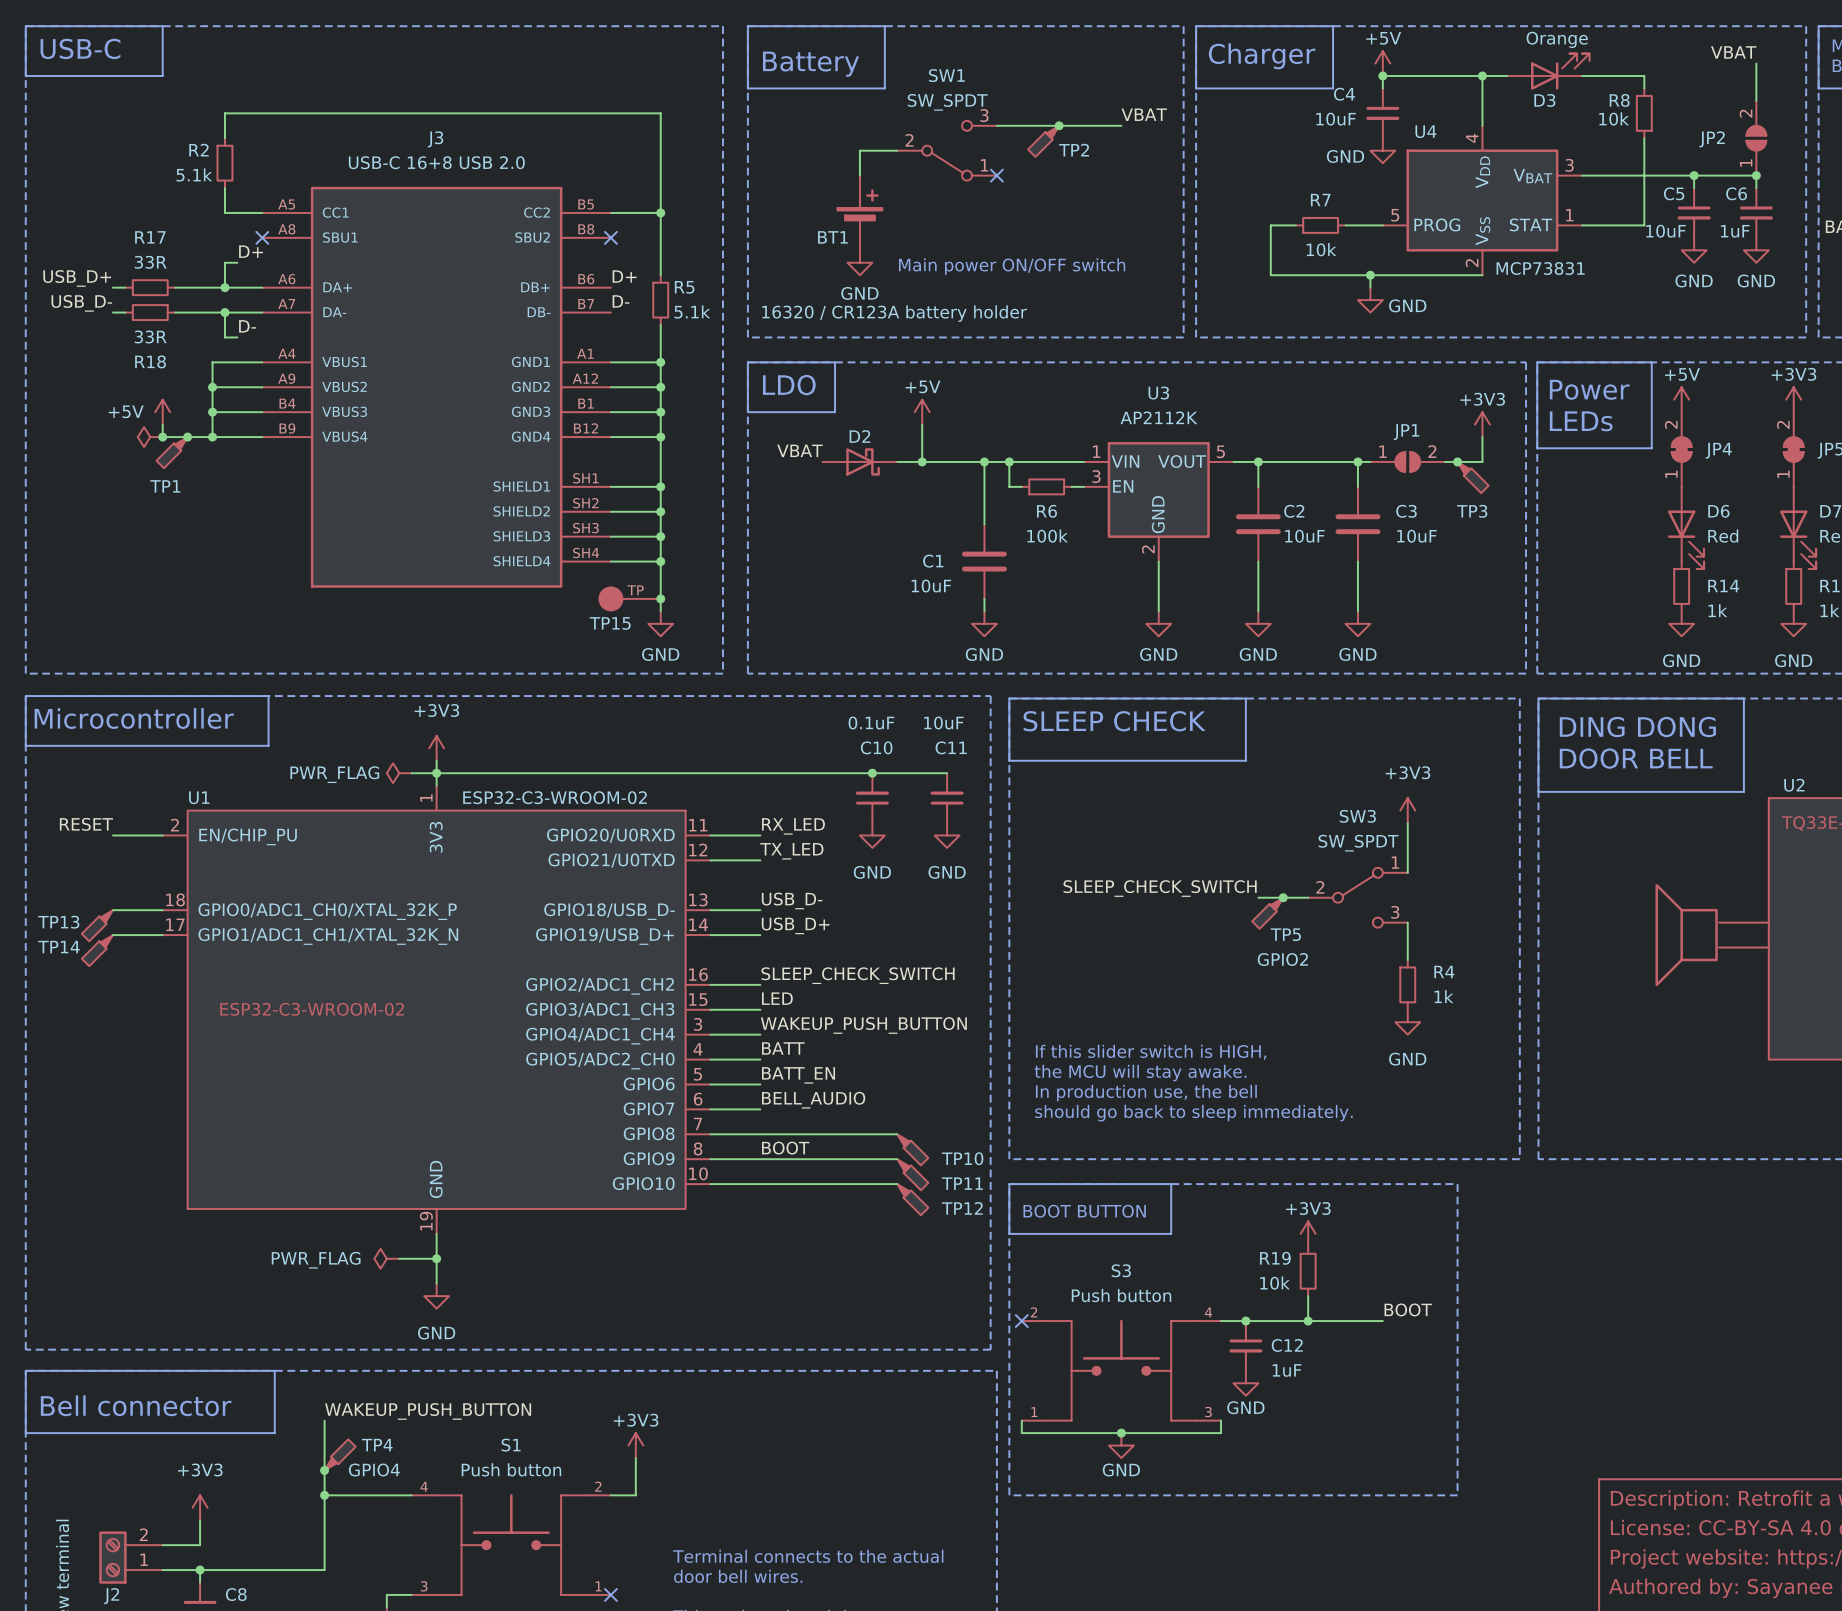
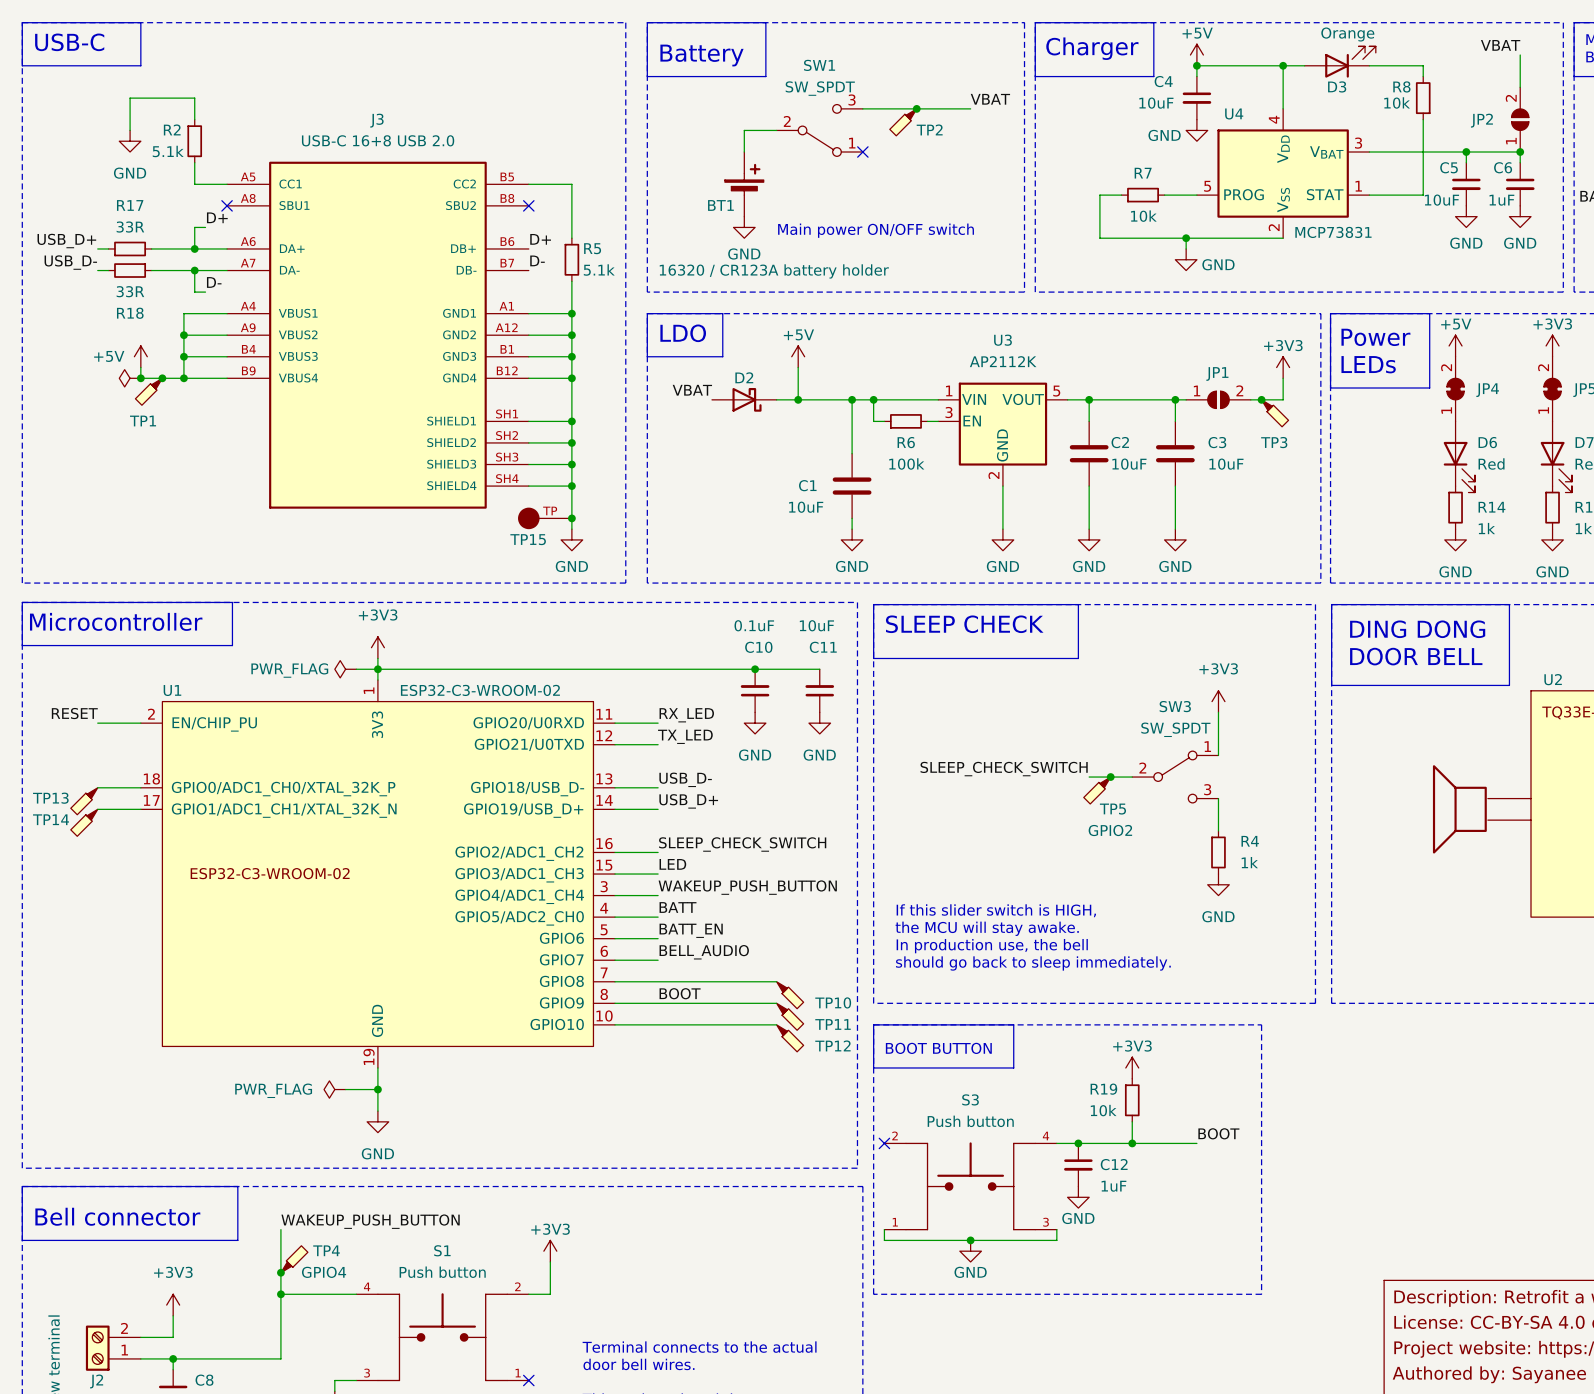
wire: (224, 113) (660, 113) (660, 212) -> (194, 98) (130, 98) (130, 130)
power symbol: none -> GND (130, 141)
junction: (660, 212) -> none

